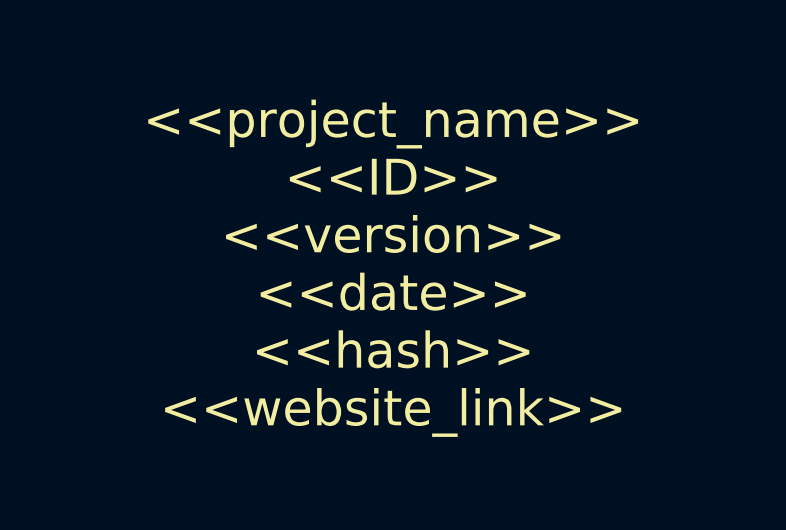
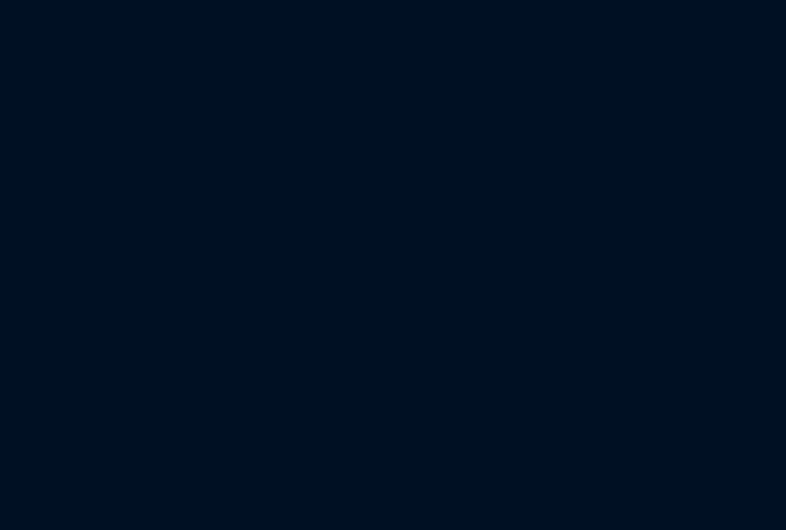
text: <<project_name>> (393, 124) -> none
text: <<ID>> (393, 176) -> none
text: <<version>> (393, 233) -> none
text: <<date>> (393, 291) -> none
text: <<hash>> (393, 349) -> none
text: <<website_link>> (393, 412) -> none

